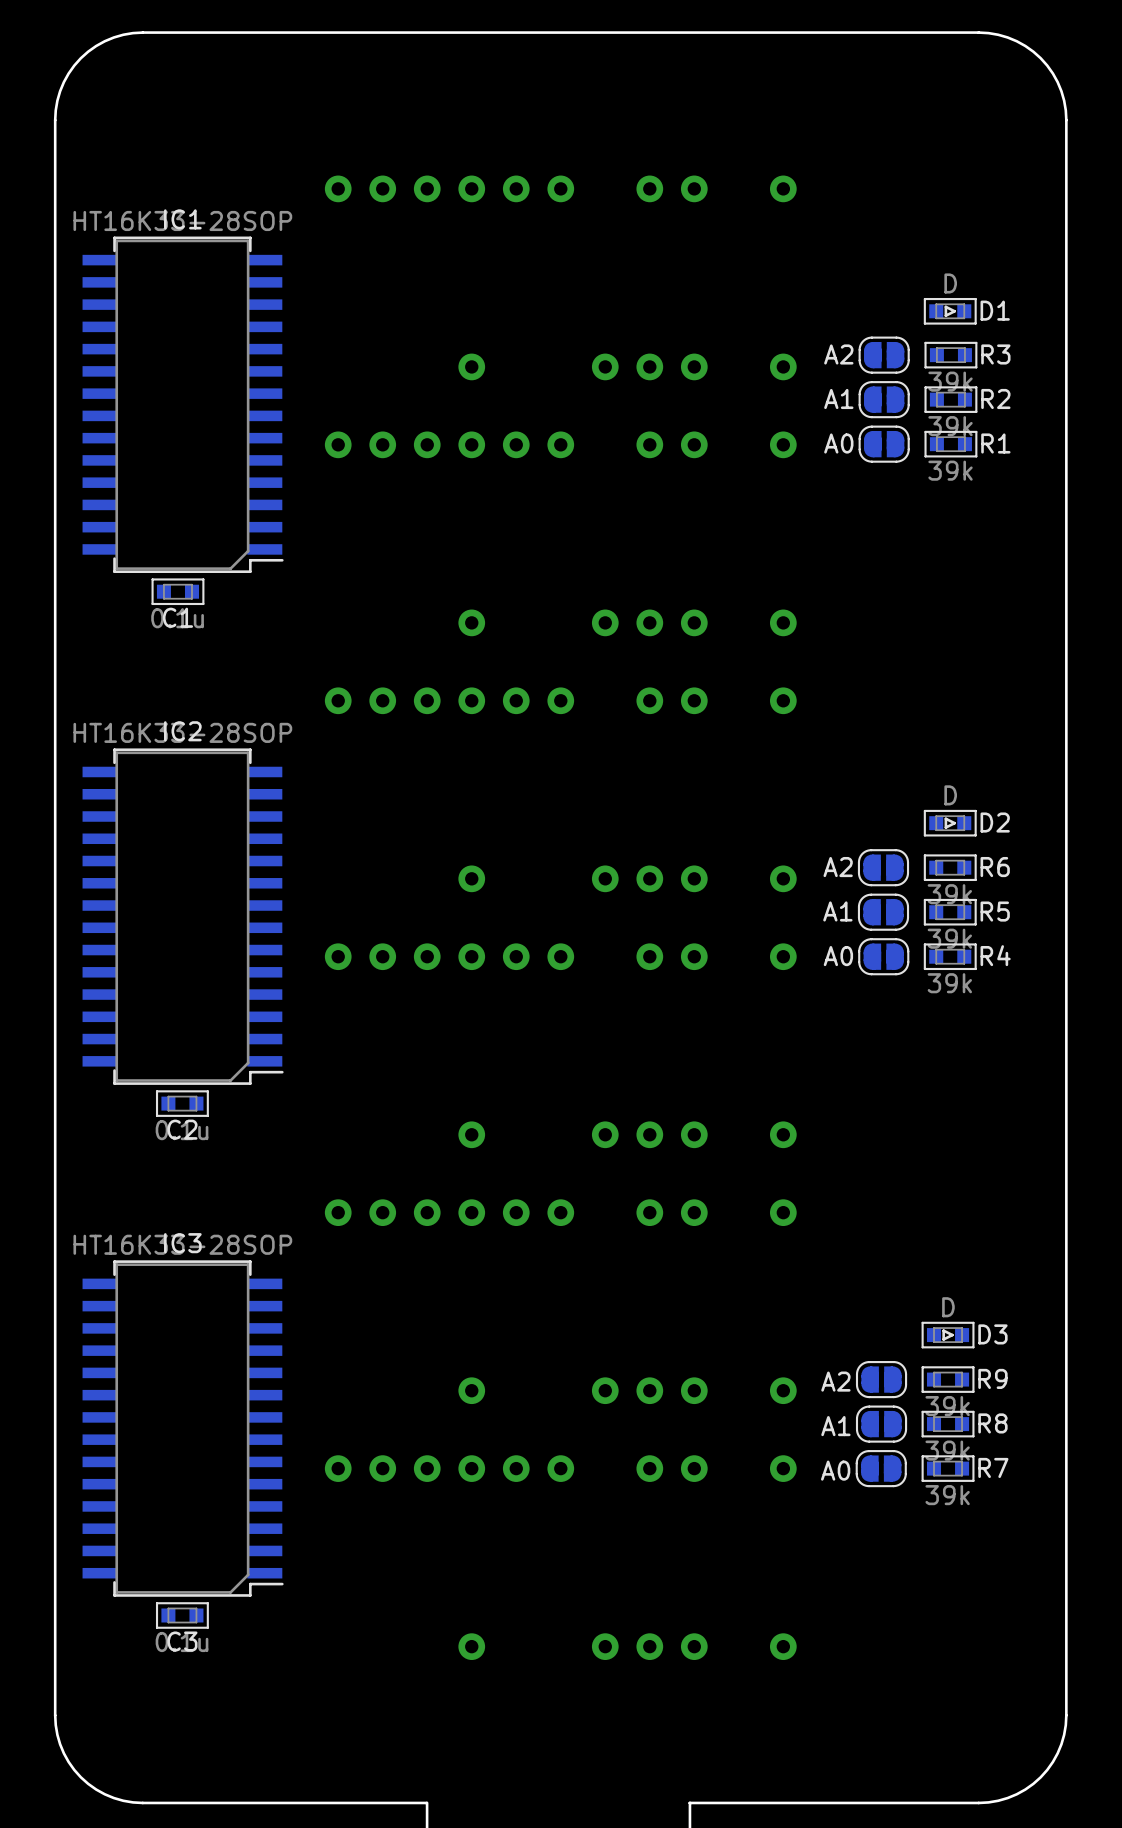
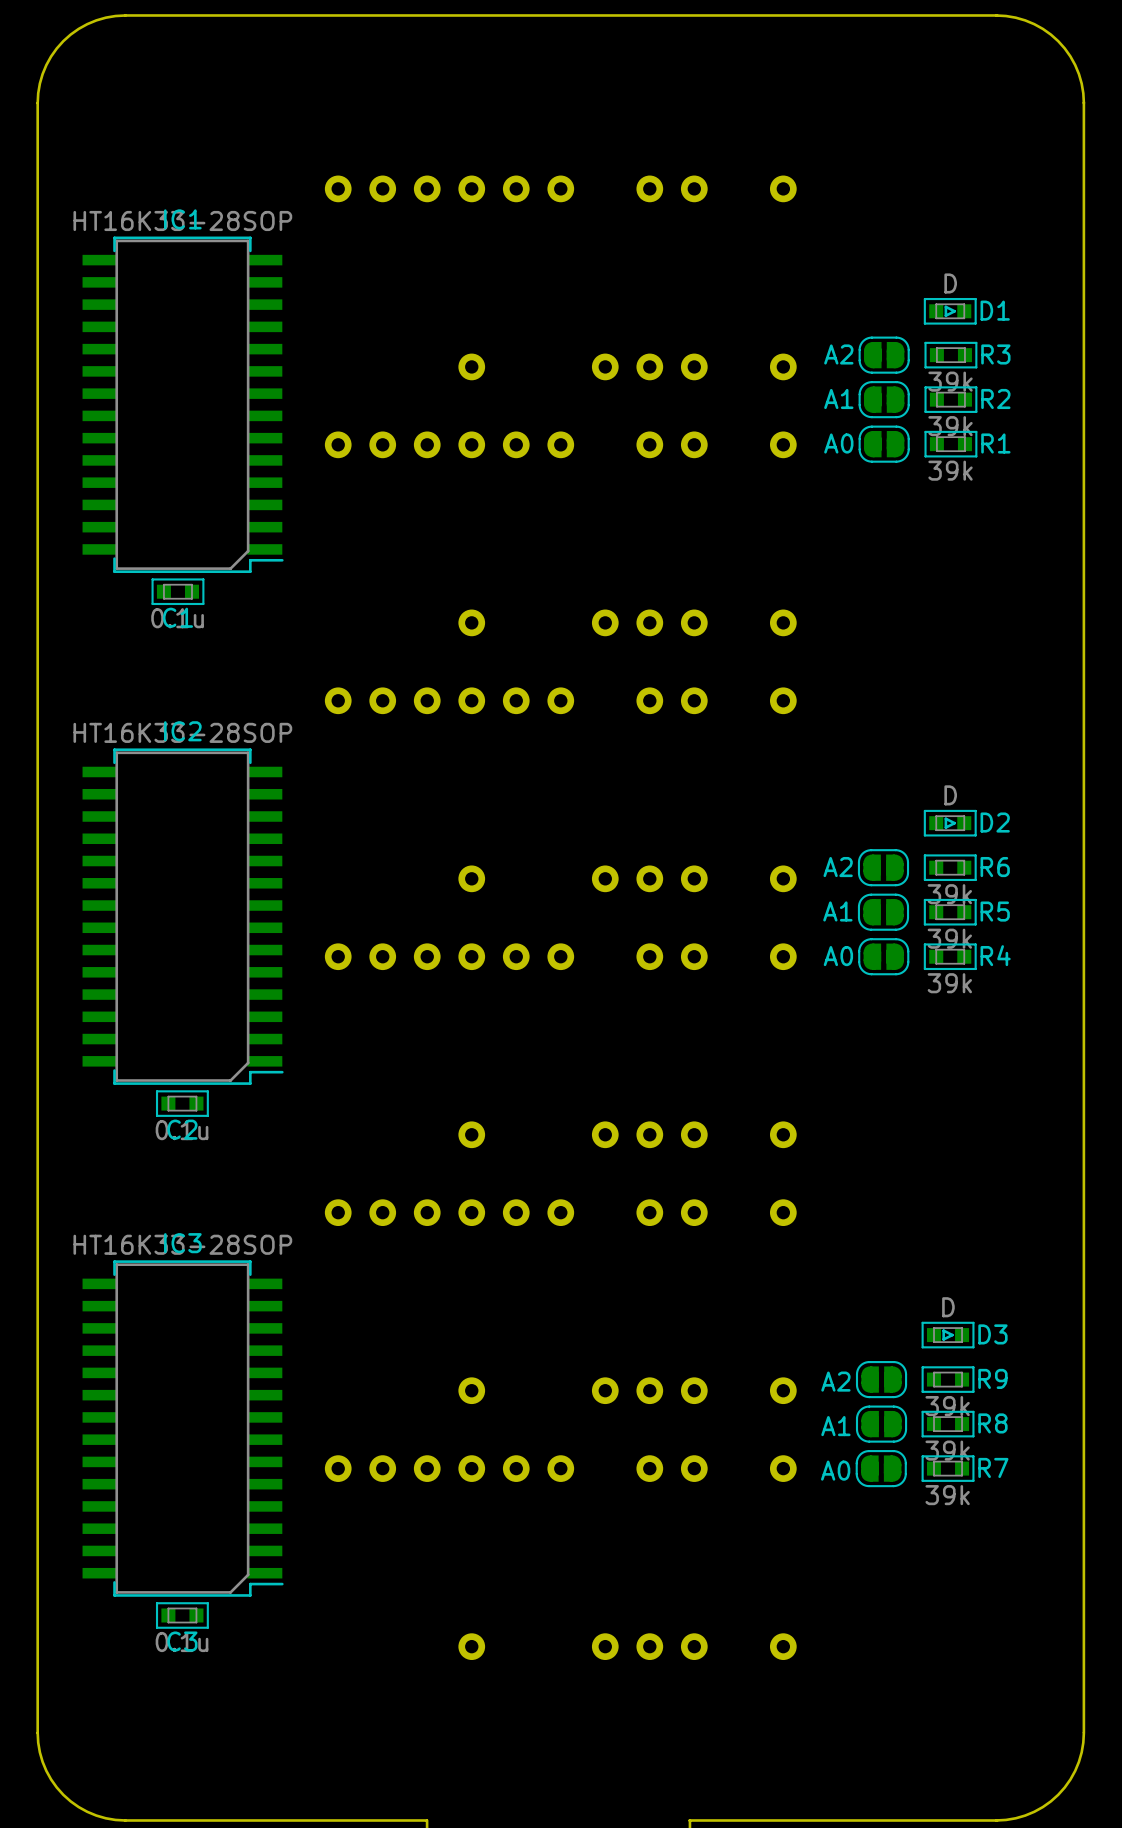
board edge: none -> (996, 15) (1015, 17) (1034, 24) (1058, 41) (1070, 56) (1078, 74) (1083, 103)
board edge: (142, 32) (113, 37) (96, 46) (80, 58) (68, 73) (60, 91) (55, 120) (55, 1725) (63, 1753) (74, 1769) (96, 1789) (123, 1800) (142, 1802) (426, 1802) -> none
board edge: (142, 32) (988, 33) (1016, 41) (1033, 51) (1047, 65) (1061, 91) (1066, 120) (1066, 1715) (1064, 1734) (1052, 1761) (1040, 1777) (1016, 1794) (998, 1800) (978, 1802) (689, 1802) -> none
board edge: none -> (1083, 102) (1083, 1732)
board edge: none -> (1083, 1732) (1078, 1761) (1070, 1779) (1058, 1794) (1034, 1811) (1015, 1818) (996, 1820)
board edge: (427, 1802) (427, 1820) -> (997, 15) (115, 16) (96, 20) (70, 34) (51, 56) (42, 74) (37, 103) (37, 1732) (39, 1752) (51, 1779) (63, 1794) (87, 1811) (105, 1818) (125, 1820) (426, 1820)
board edge: (689, 1802) (689, 1820) -> (997, 1820) (689, 1820)

